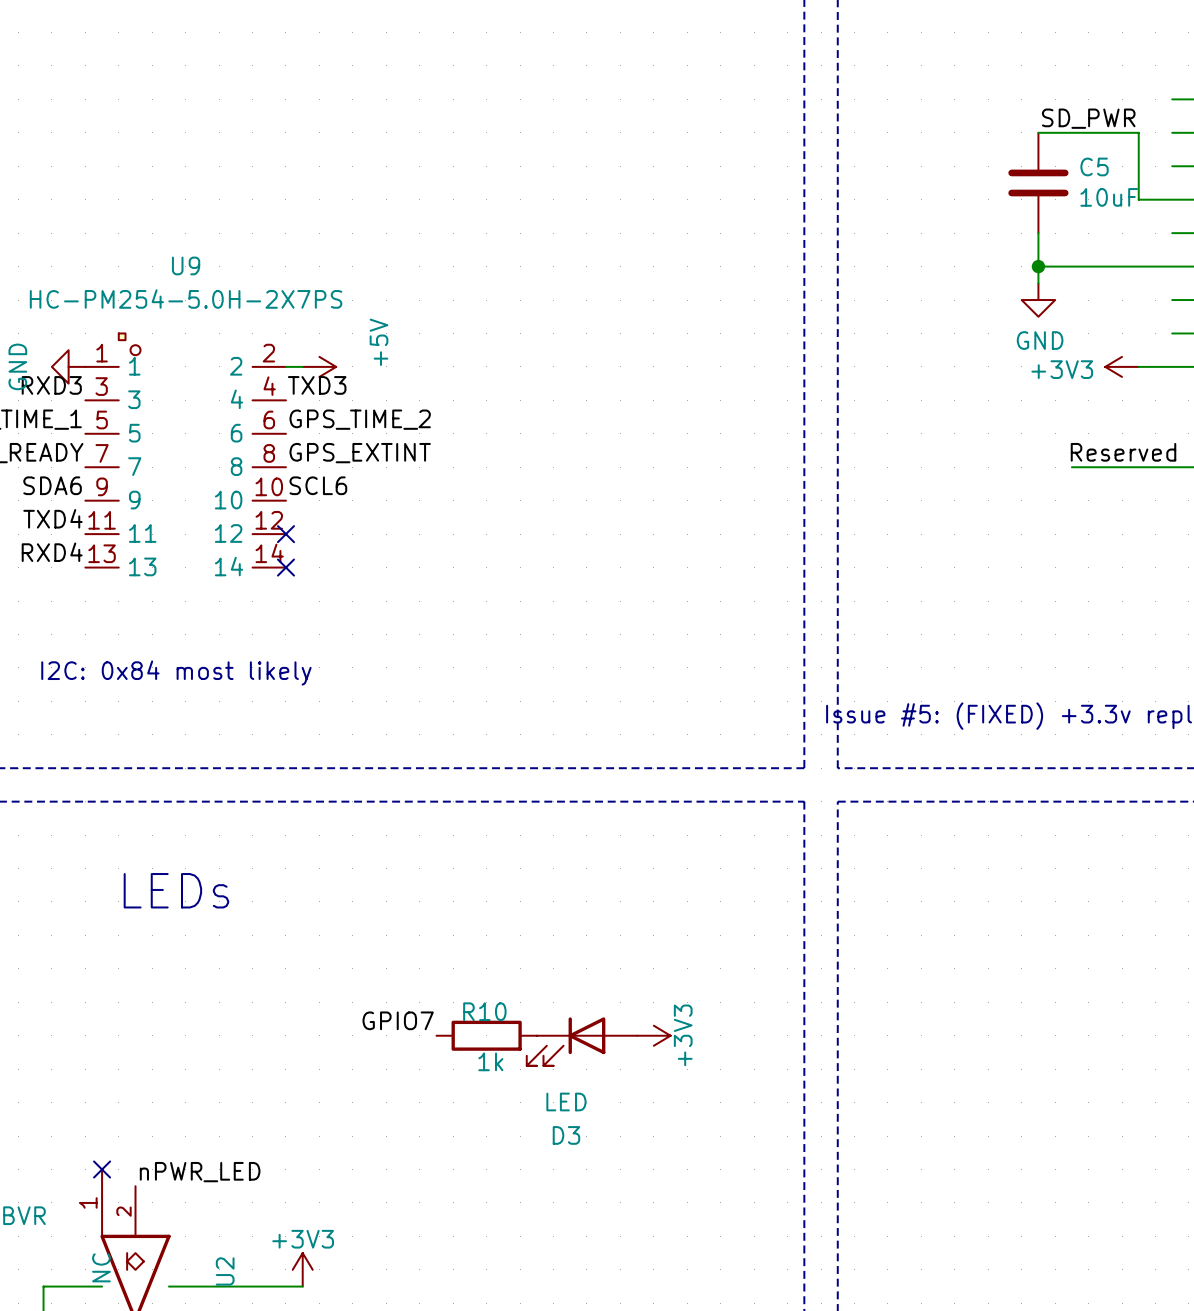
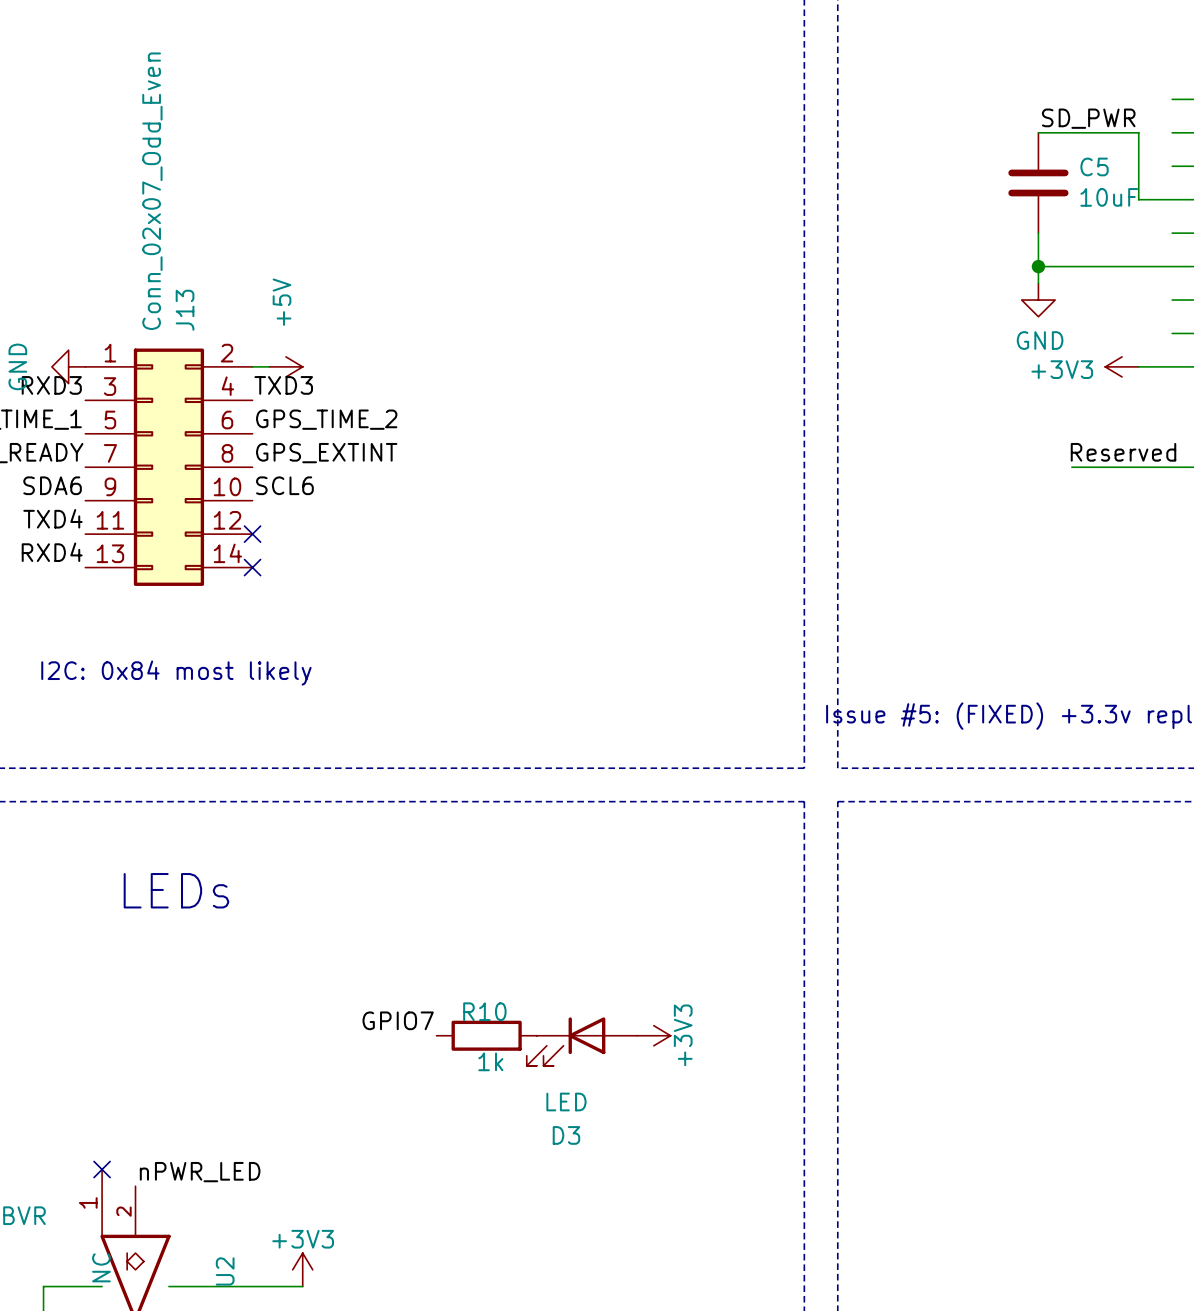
power symbol text position: +5V (379, 342) -> +5V (282, 302)
power symbol position: +5V (319, 366) -> +5V (285, 366)
label position: TXD3 (317, 385) -> TXD3 (283, 385)
label position: GPS_TIME_2 (360, 419) -> GPS_TIME_2 (326, 419)
U9: HC-PM254-5.0H-2X7PS (185, 450) -> none
label position: GPS_EXTINT (360, 453) -> GPS_EXTINT (326, 453)
J13: none -> Conn_02x07_Odd_Even (168, 467)
label position: SCL6 (318, 485) -> SCL6 (284, 485)
no-connect mark: none -> (252, 534)
no-connect mark: (285, 534) -> none
no-connect mark: none -> (252, 567)
no-connect mark: (285, 567) -> none

